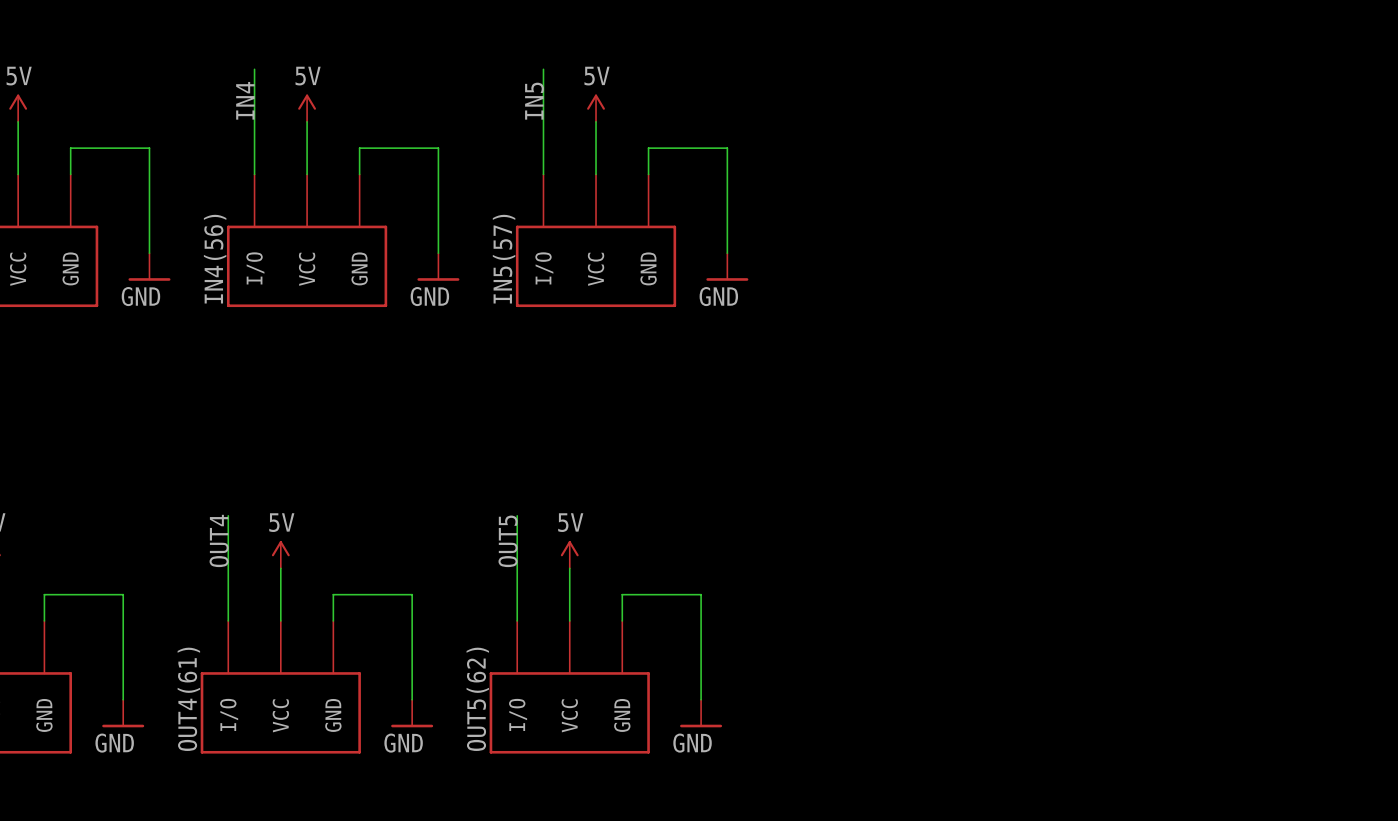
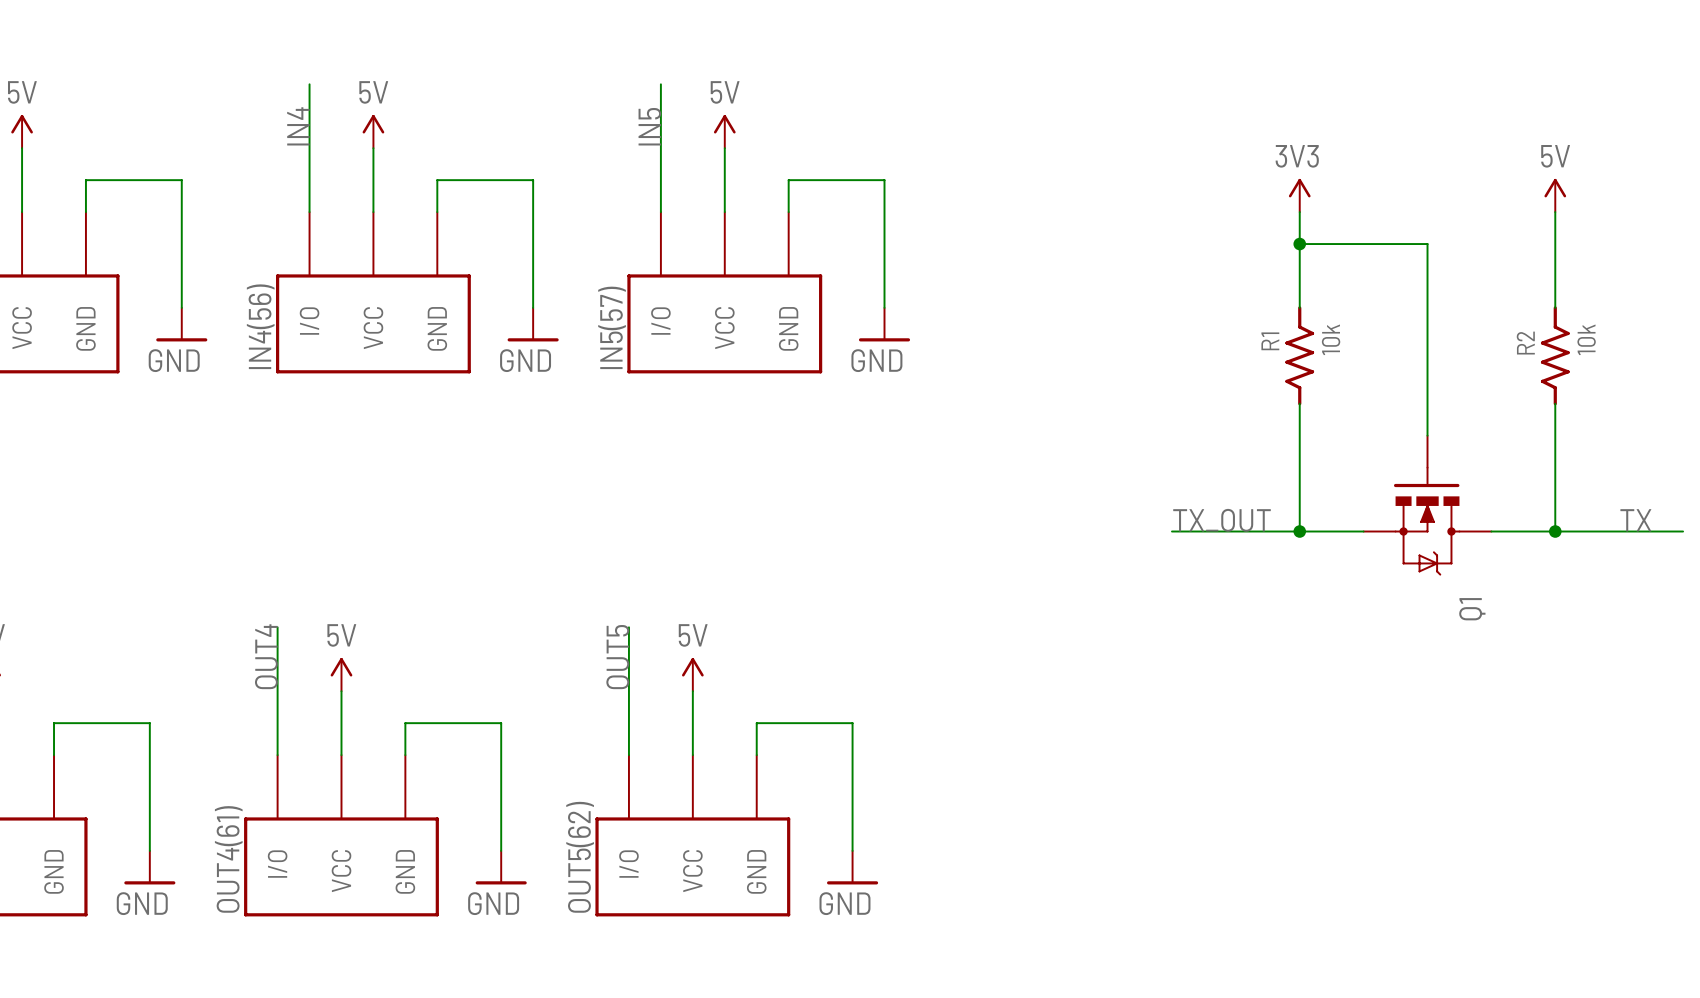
power symbol: none -> 3V3 (1299, 195)
power symbol: none -> 5V (1555, 195)
wire: none -> (1299, 212) (1299, 307)
wire: none -> (1555, 212) (1555, 307)
wire: none -> (1299, 244) (1427, 244) (1427, 435)
junction: none -> (1299, 244)
R1: none -> 10k (1299, 355)
R2: none -> 10k (1555, 355)
wire: none -> (1299, 403) (1299, 531)
wire: none -> (1555, 403) (1555, 531)
Q1: none -> (1427, 505)
label: none -> TX (1635, 520)
label: none -> TX_OUT (1222, 520)
wire: none -> (1171, 531) (1363, 531)
junction: none -> (1299, 531)
wire: none -> (1491, 531) (1683, 531)
junction: none -> (1555, 531)

